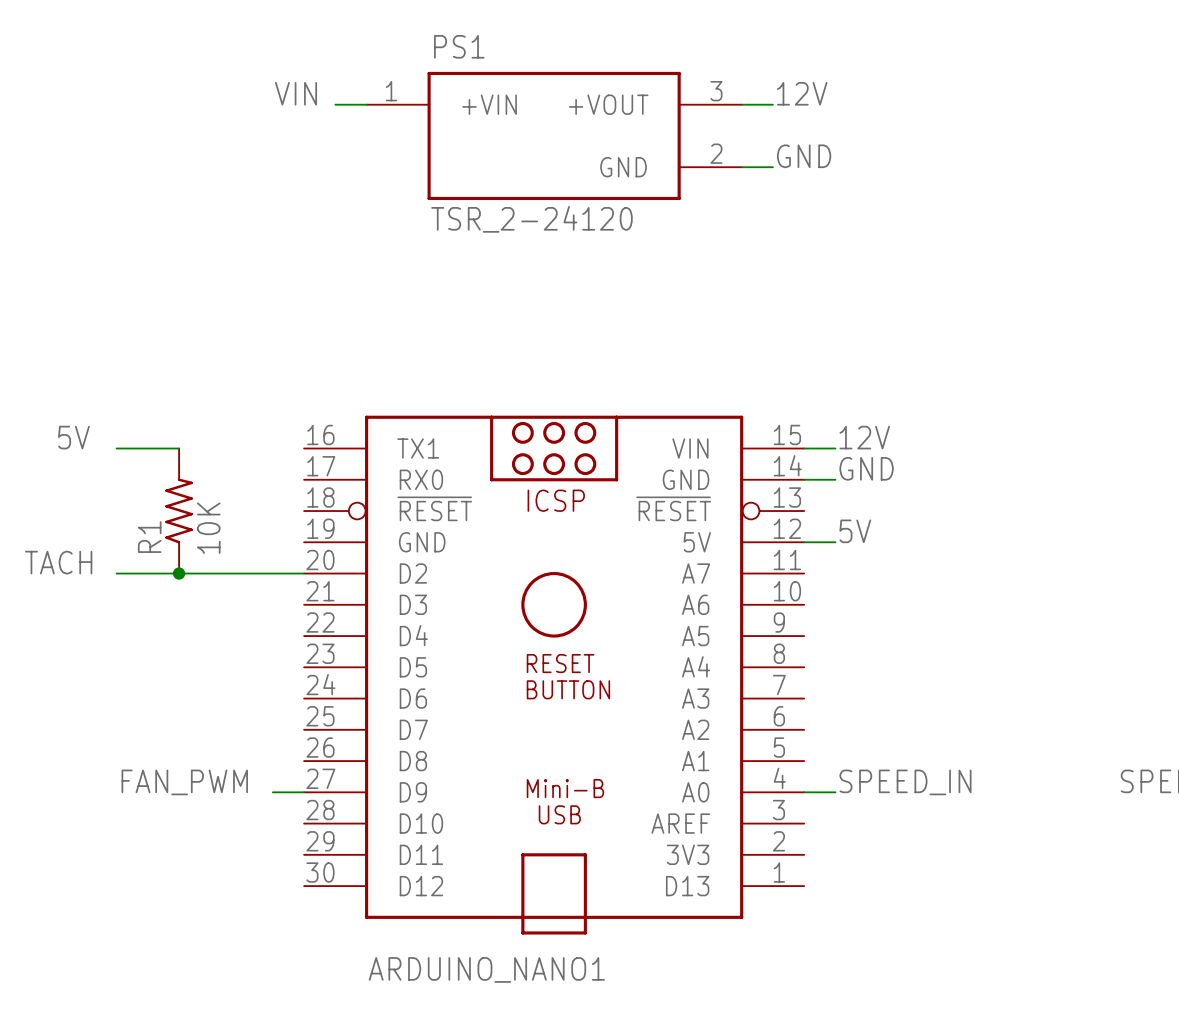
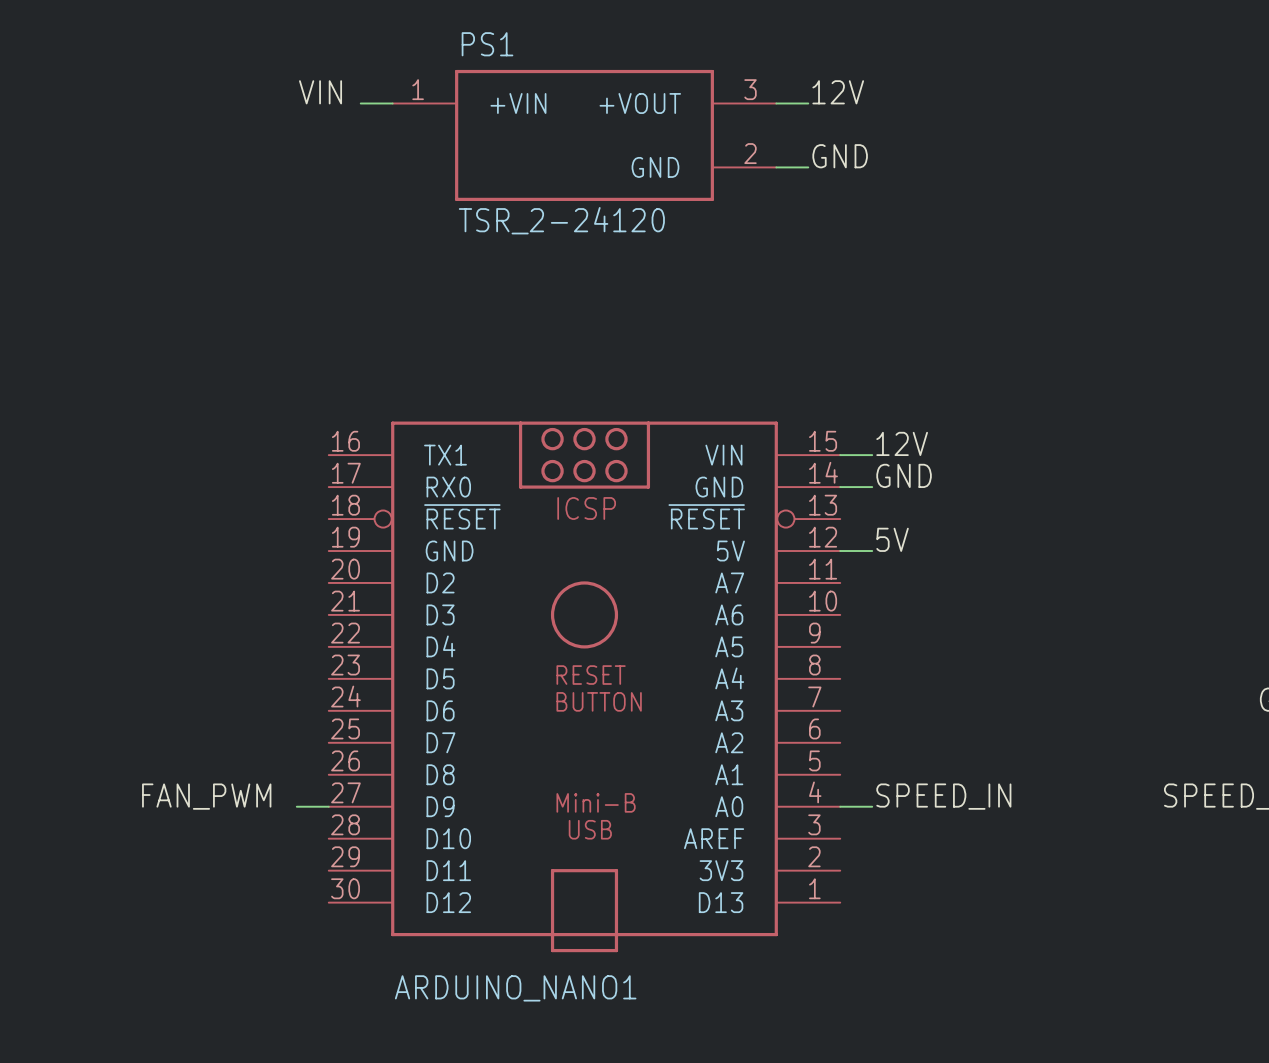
label: 5V (73, 437) -> none
wire: (116, 448) (179, 448) -> none
R1: 10K (179, 511) -> none
label: TACH (58, 562) -> none
wire: (116, 573) (304, 573) -> none
junction: (179, 573) -> none

